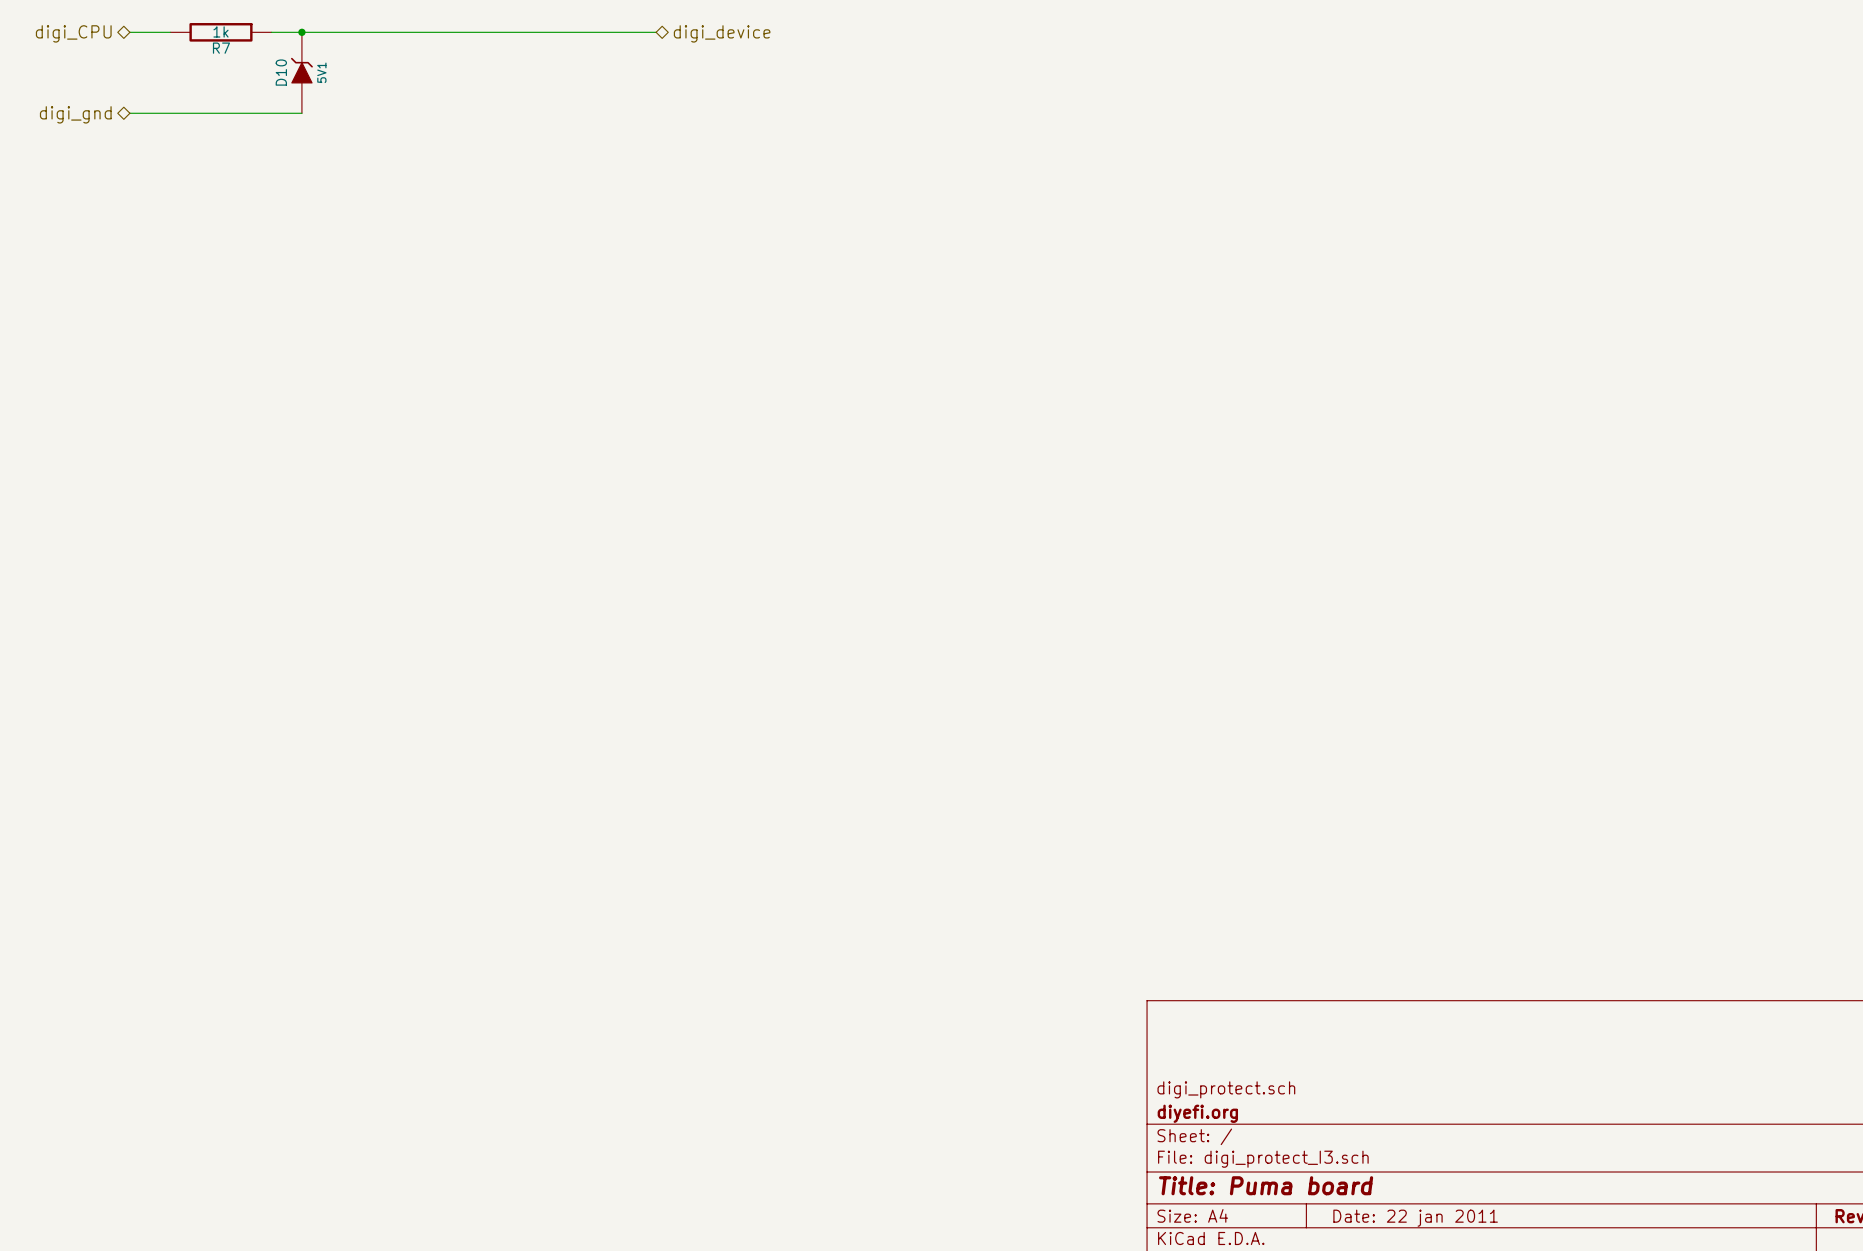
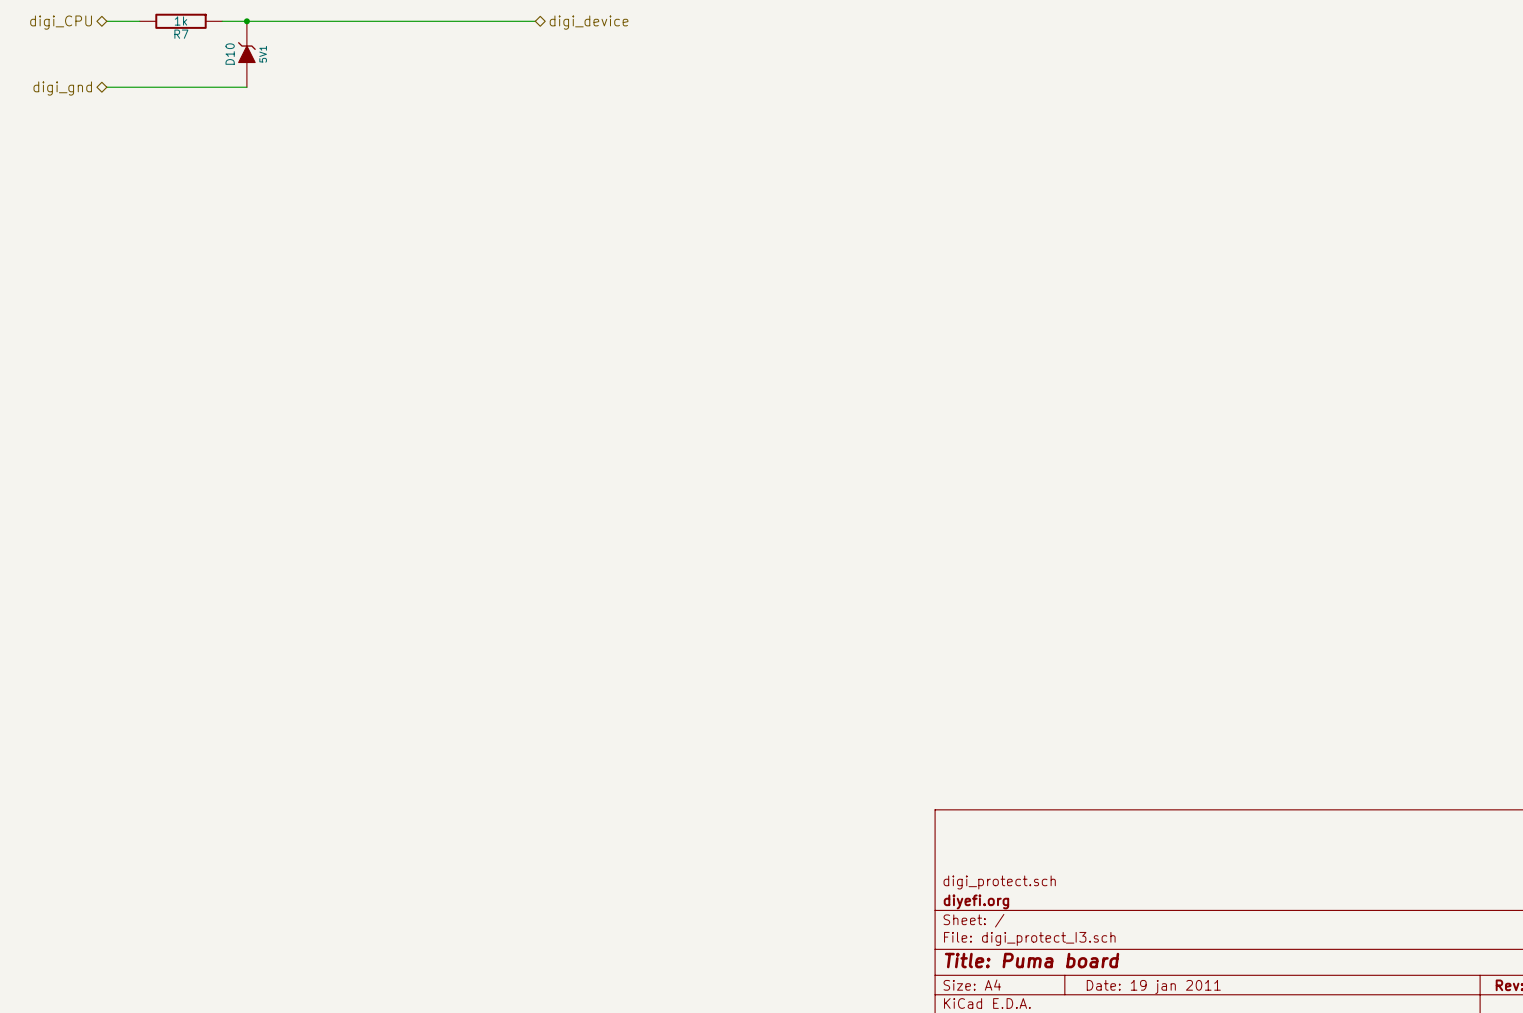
title block: Date: 22 jan 2011 (1415, 1218) -> Date: 19 jan 2011 (1153, 986)

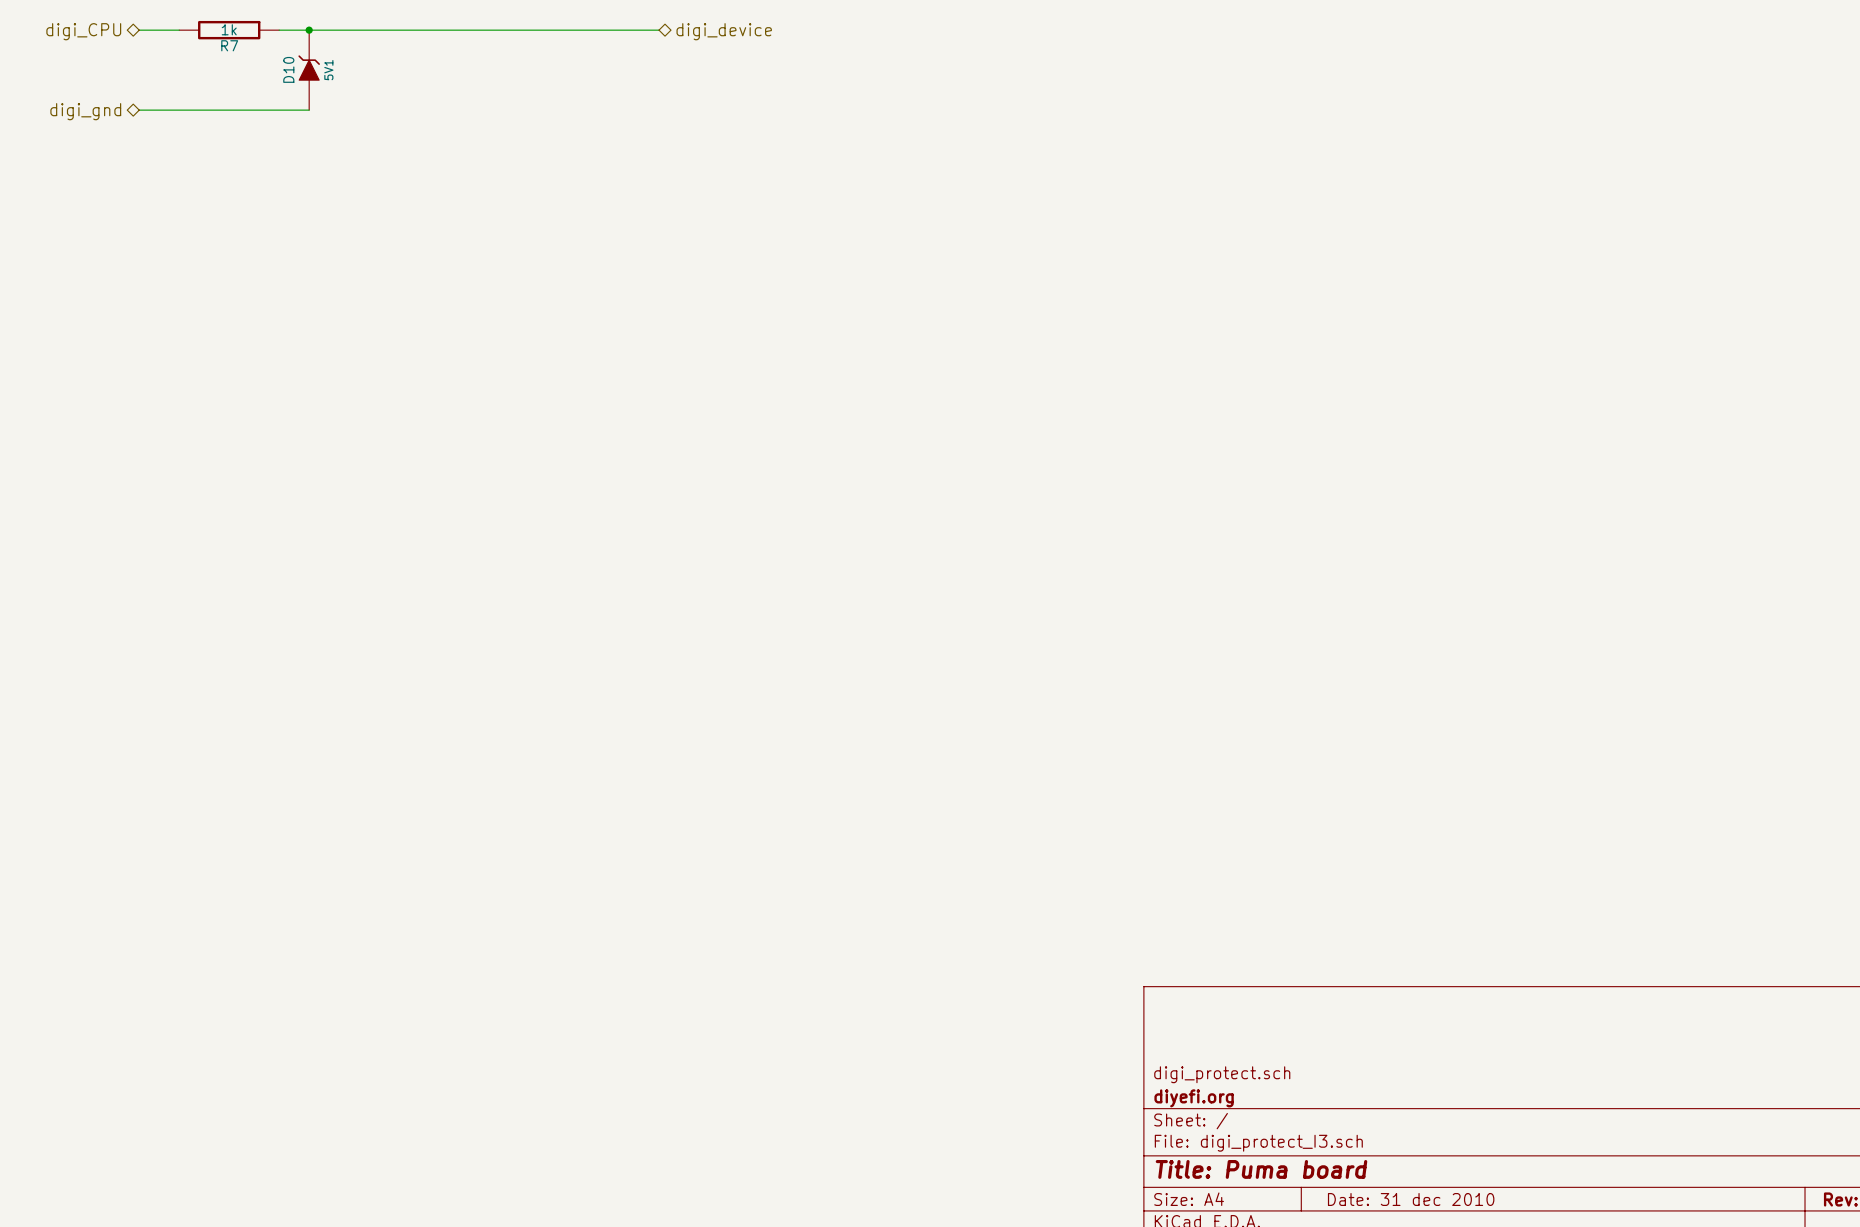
title block: Date: 19 jan 2011 (1153, 986) -> Date: 31 dec 2010 (1411, 1199)

